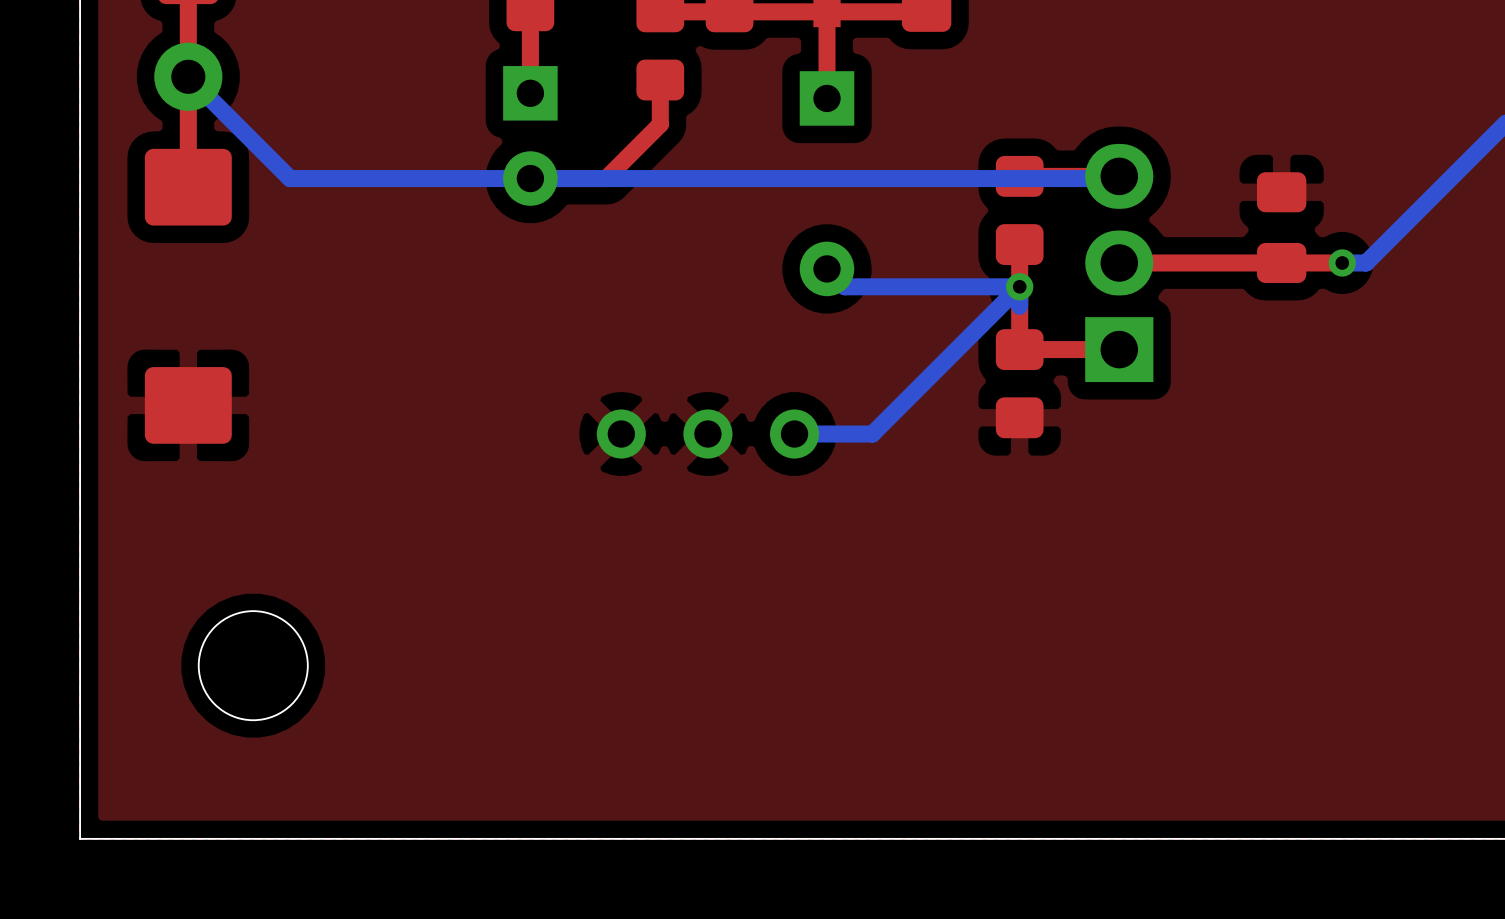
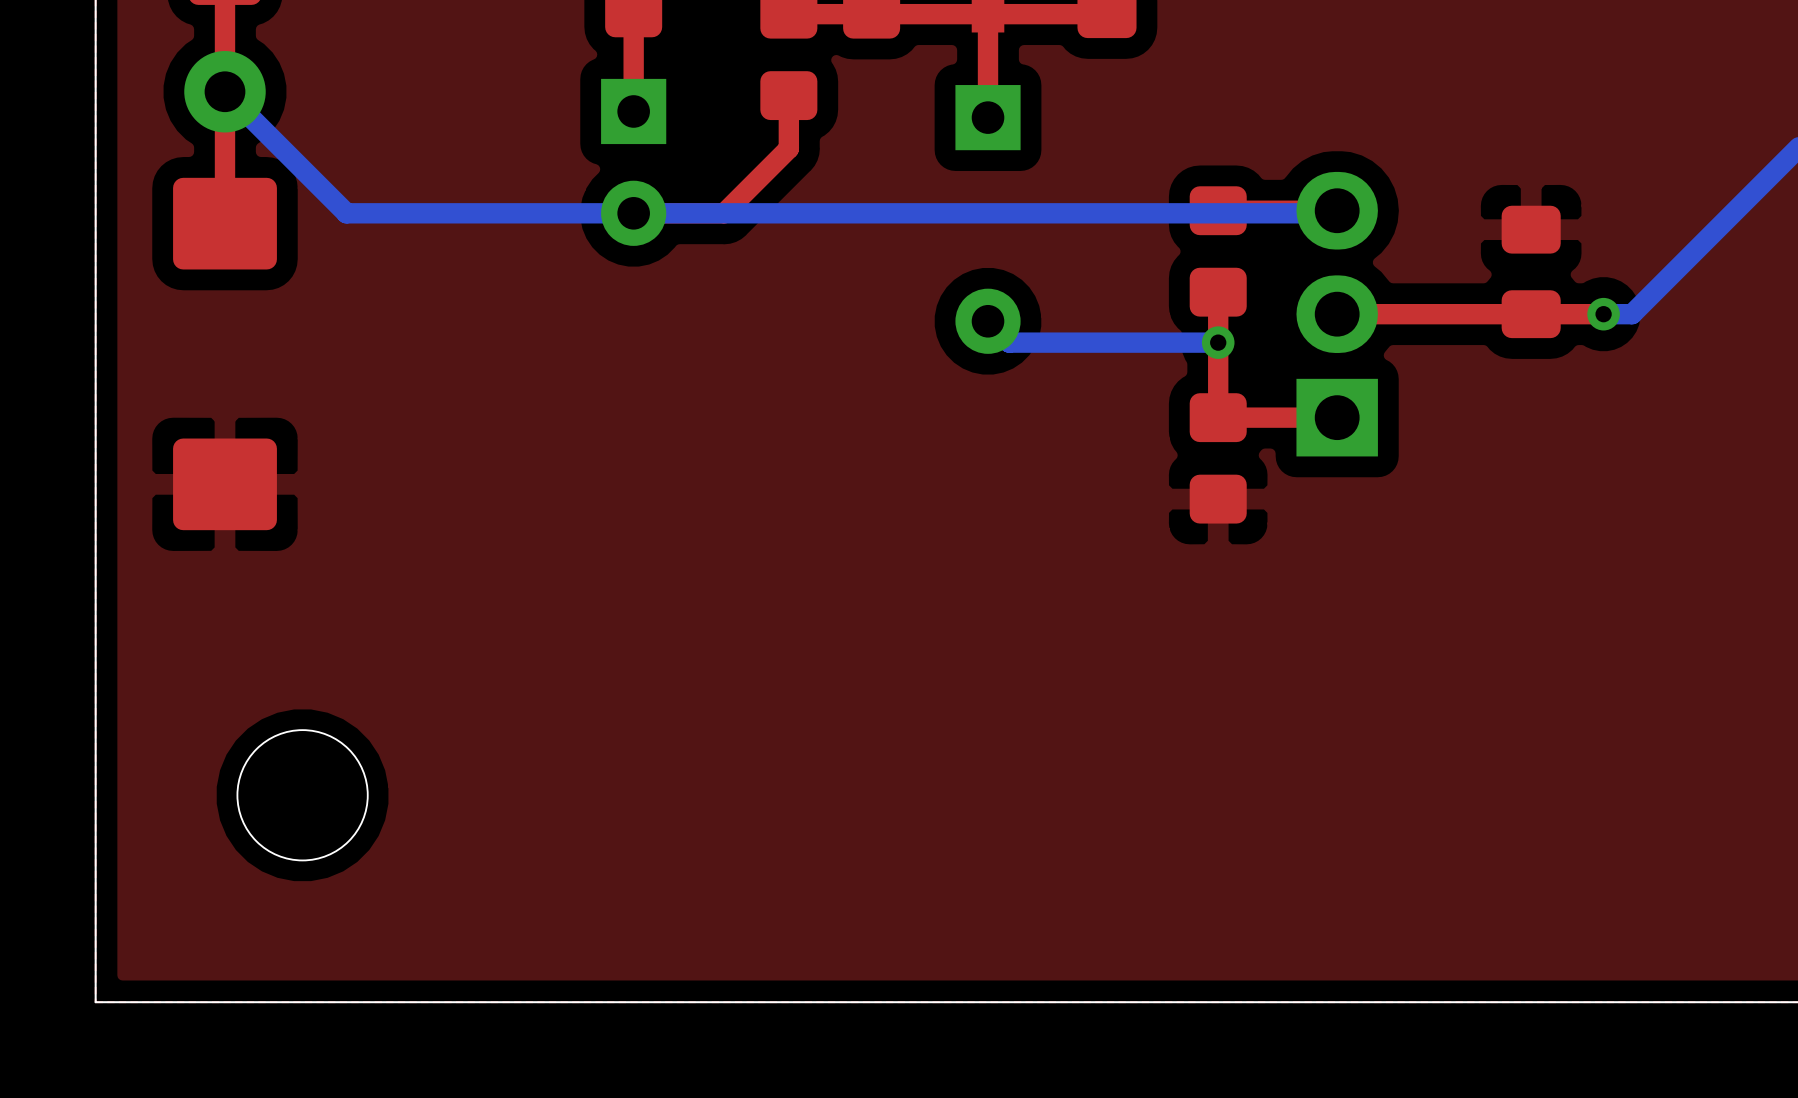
bottom track: (1019, 306) (1019, 286) (872, 434) (794, 434) -> none
part: (707, 434) -> none

